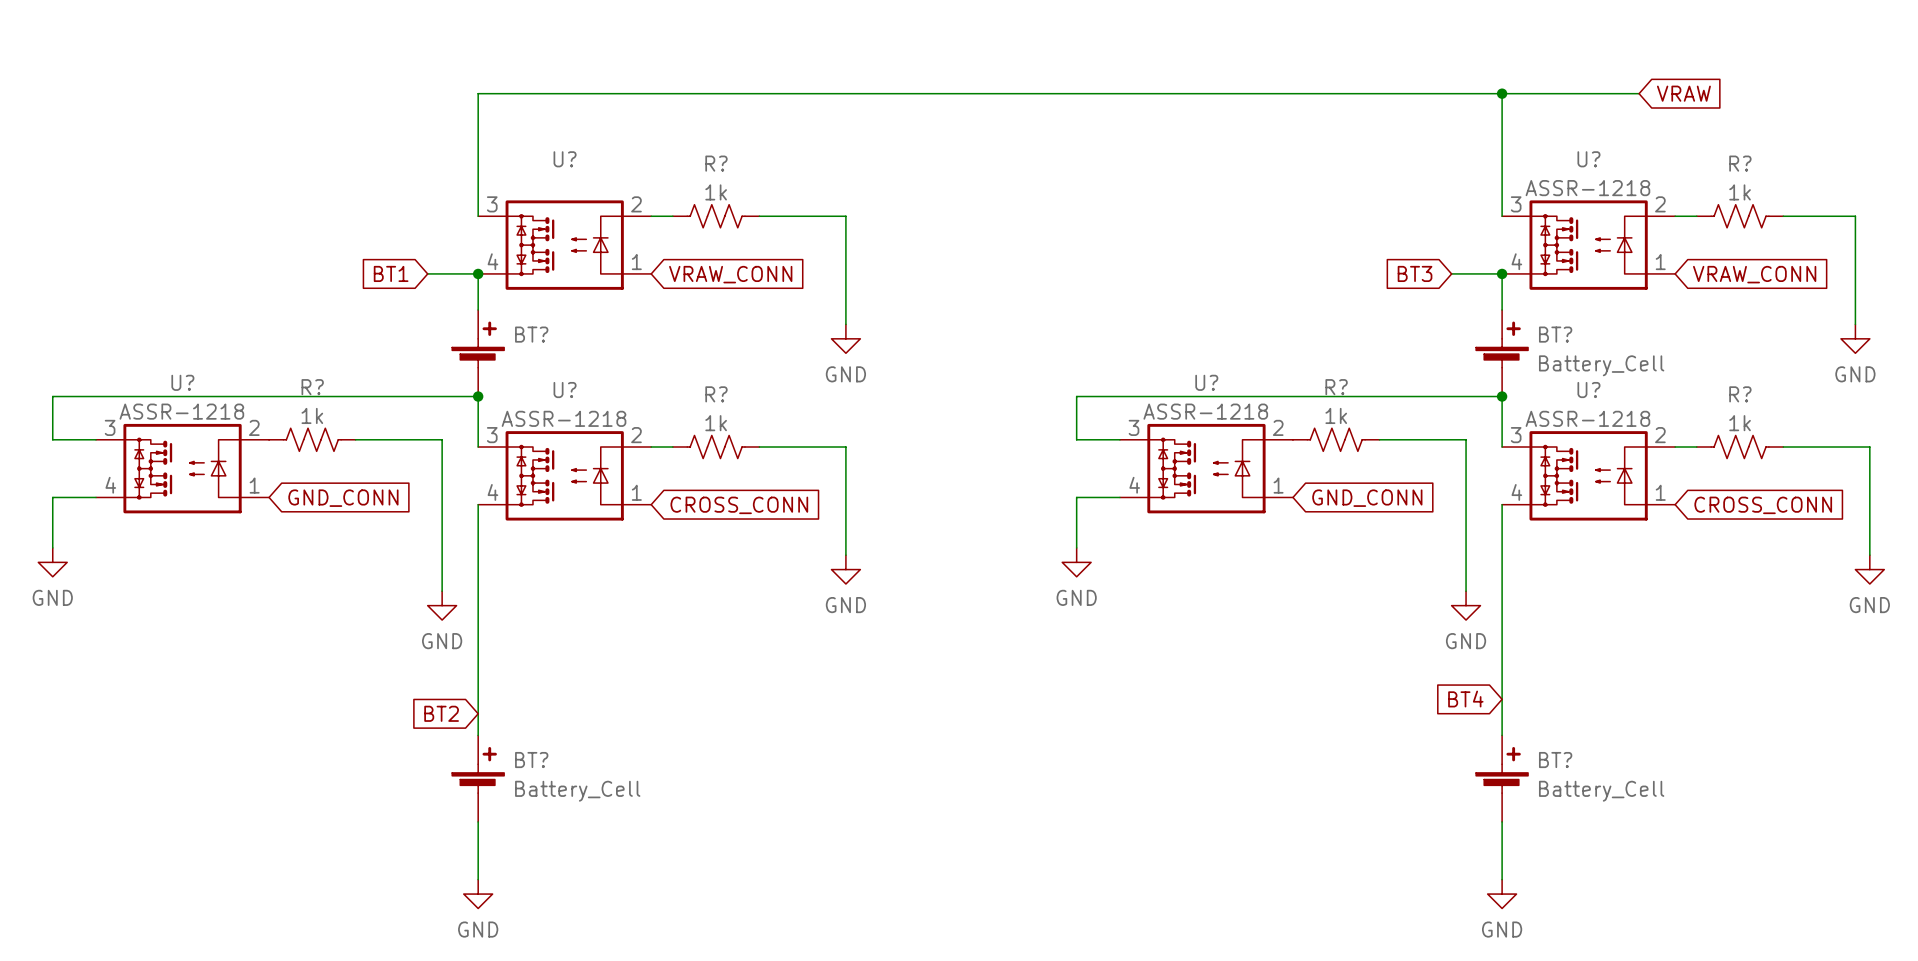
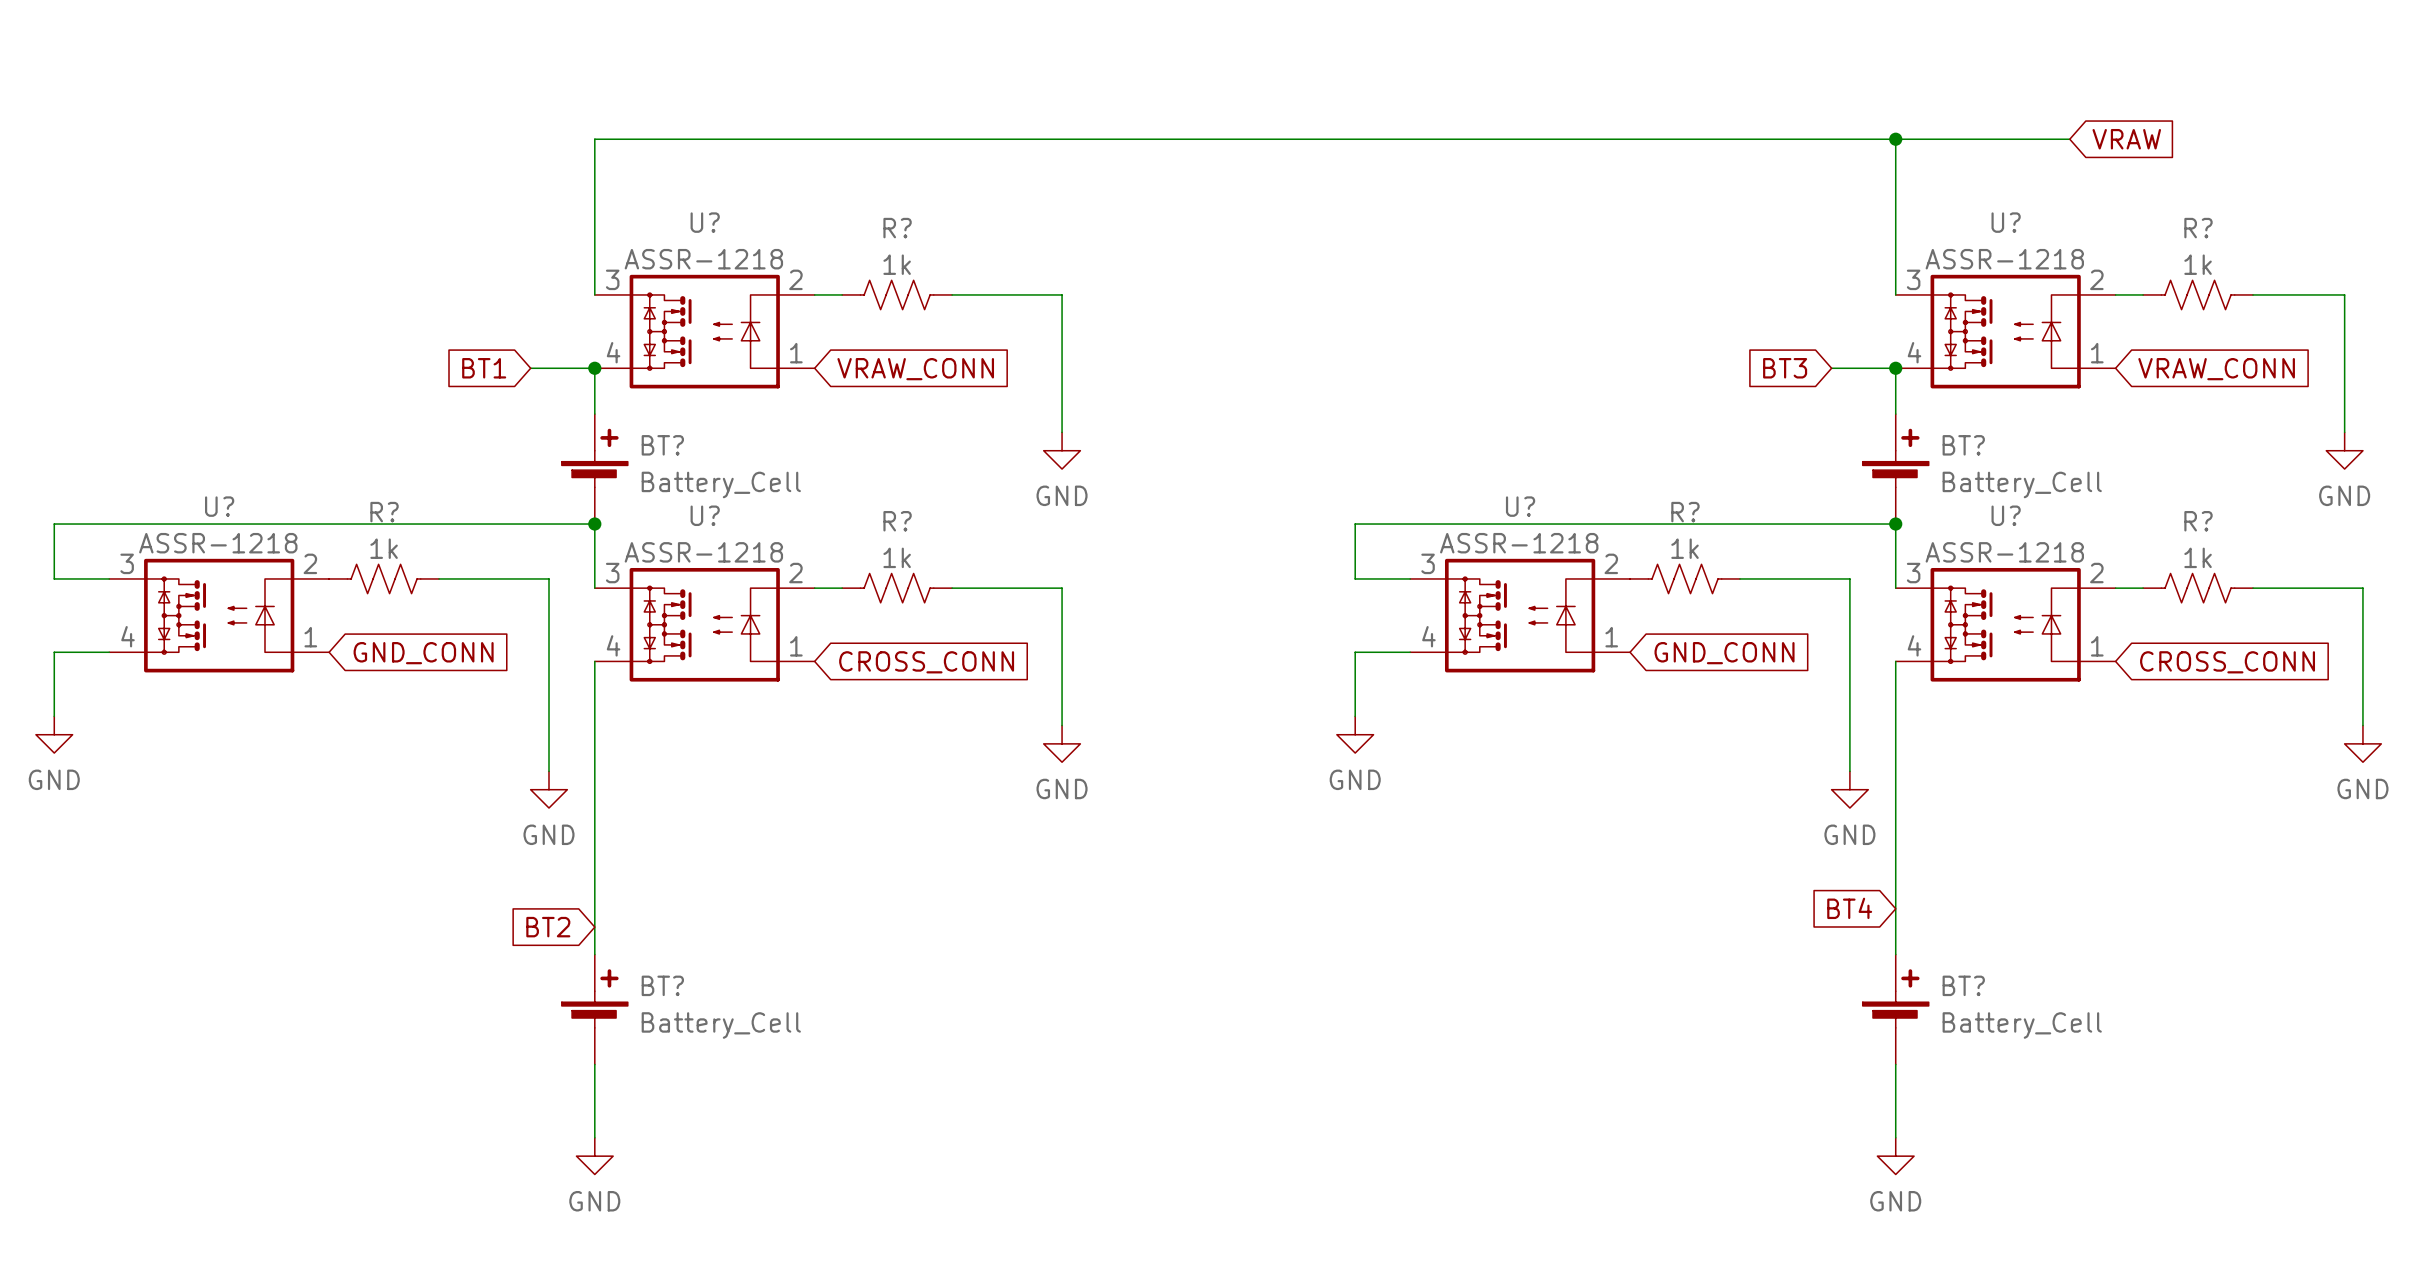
U? value: none -> ASSR-1218 (703, 259)
BT? value: none -> Battery_Cell (721, 484)

